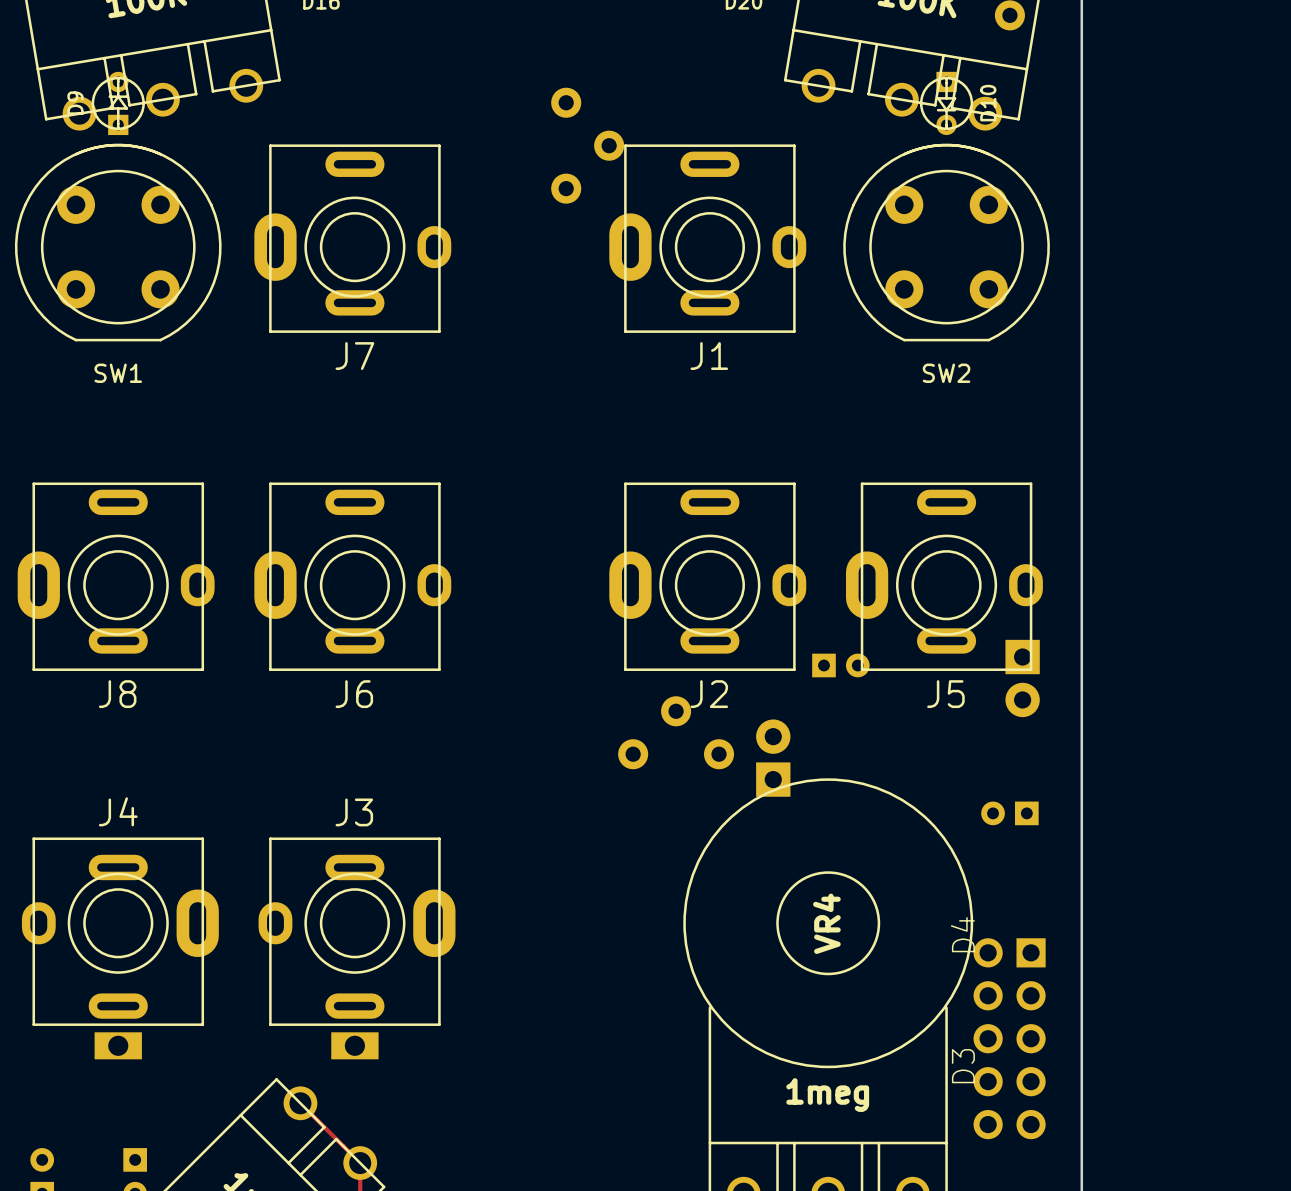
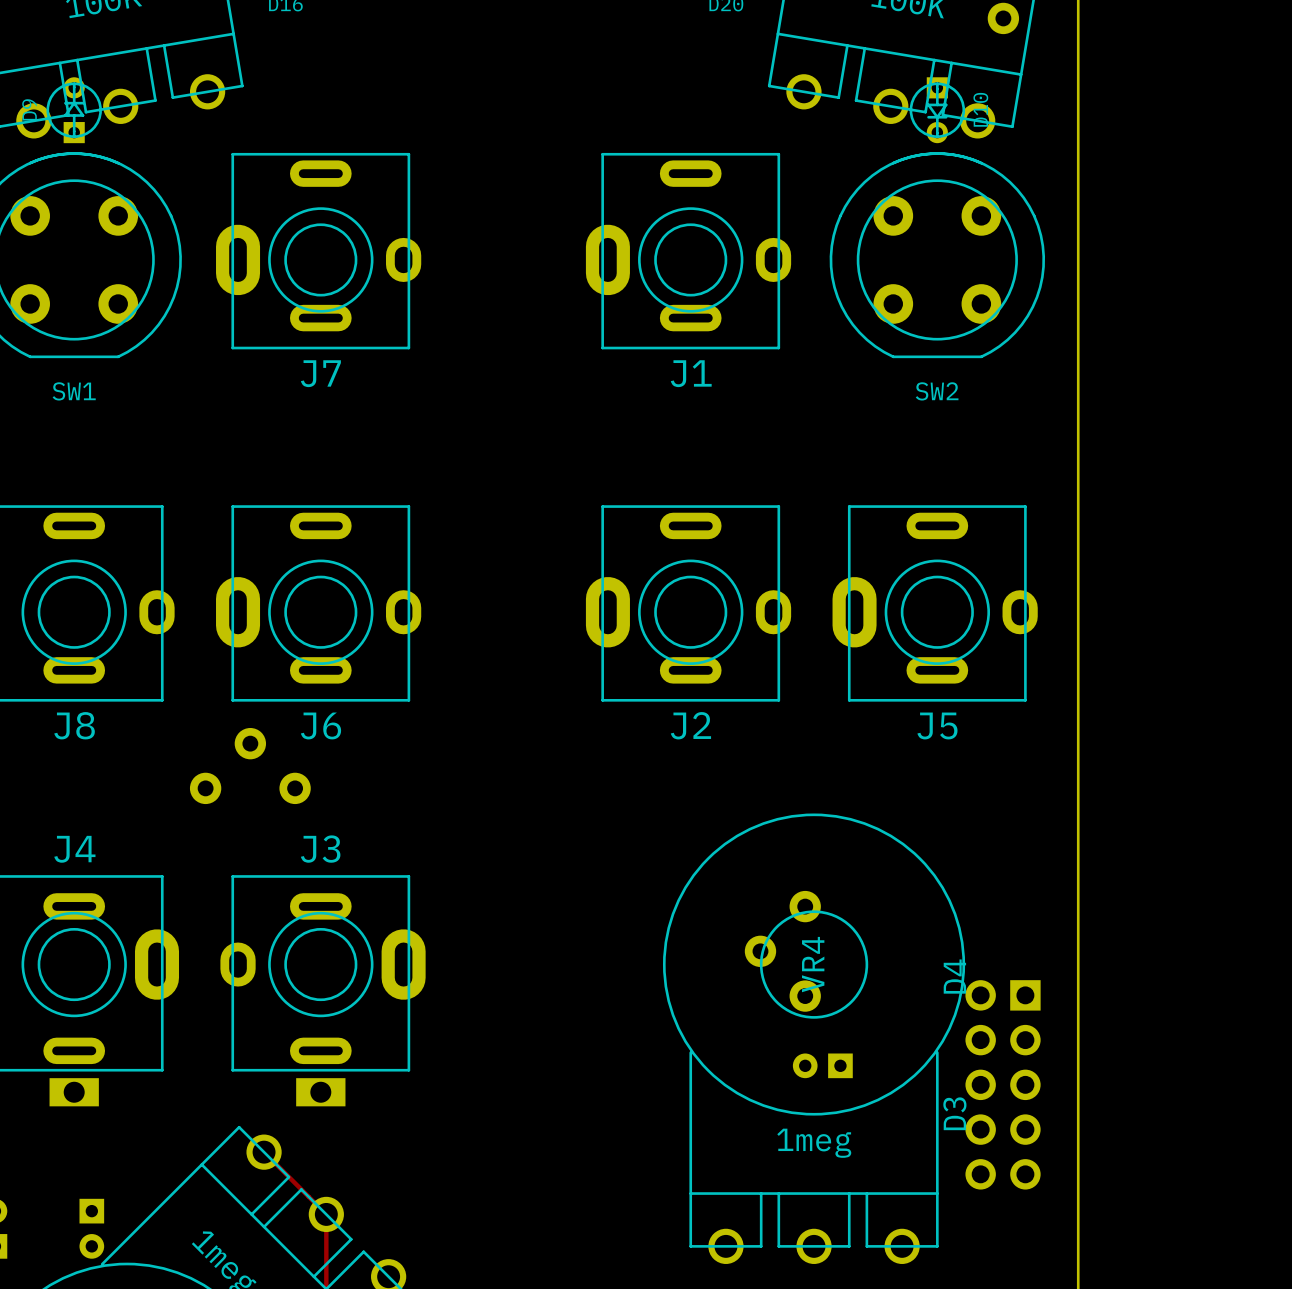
part: (587, 145) -> none
part: (840, 665) -> none
part: (1022, 678) -> none
part: none -> (250, 766)
part: (676, 732) -> none
part: (773, 758) -> none
part: (1009, 813) -> none
part: none -> (782, 951)
part: none -> (822, 1065)

